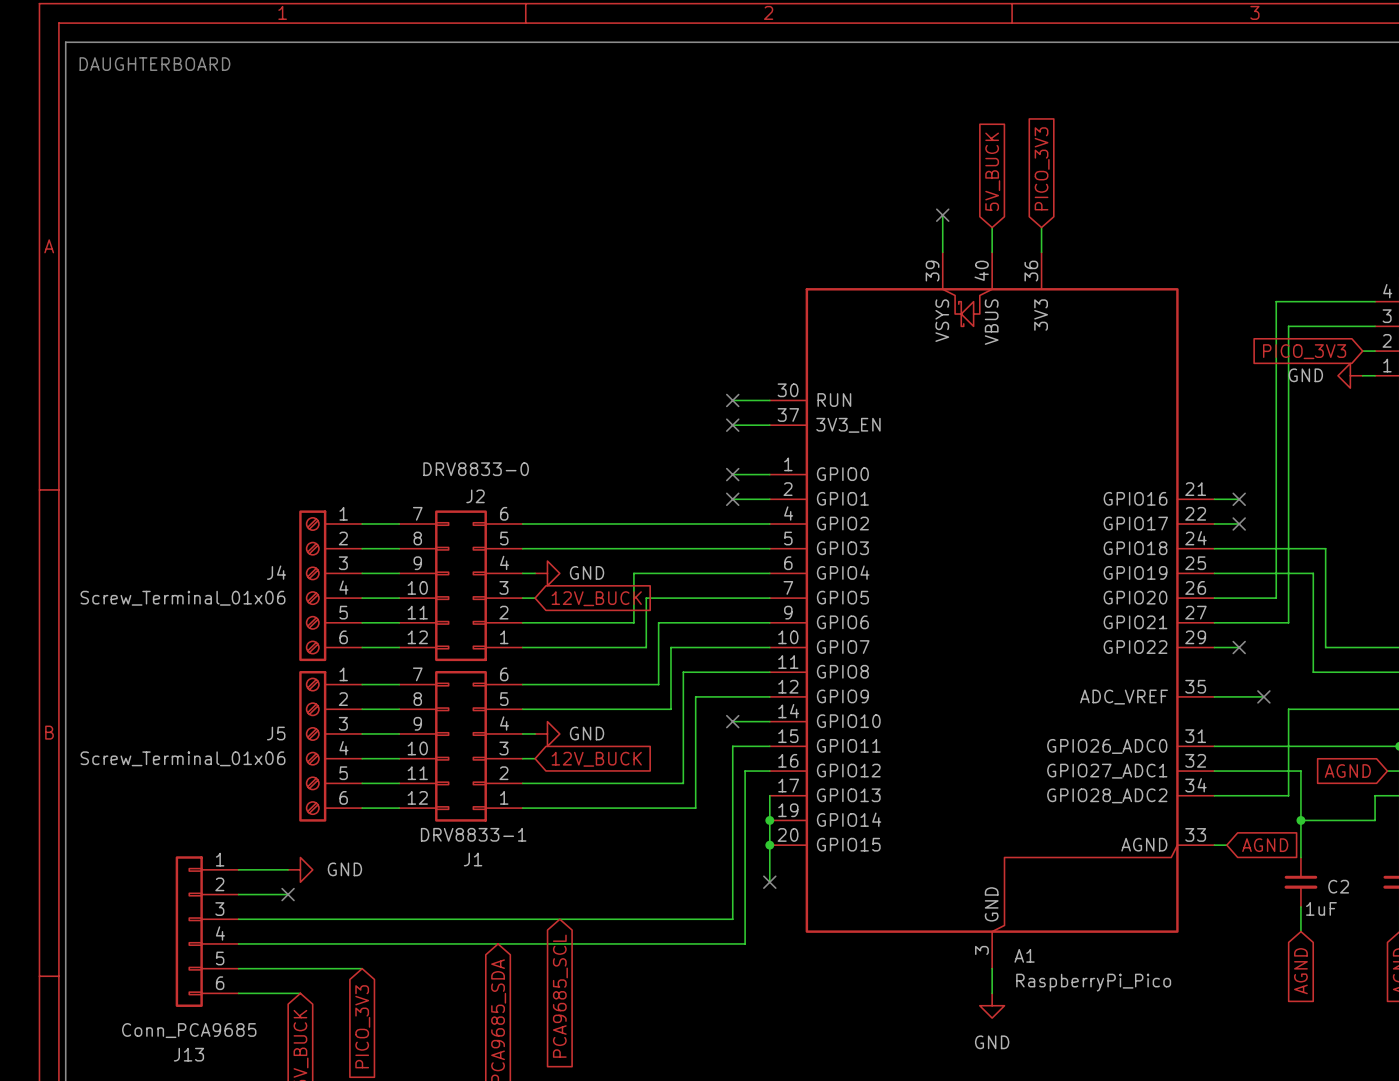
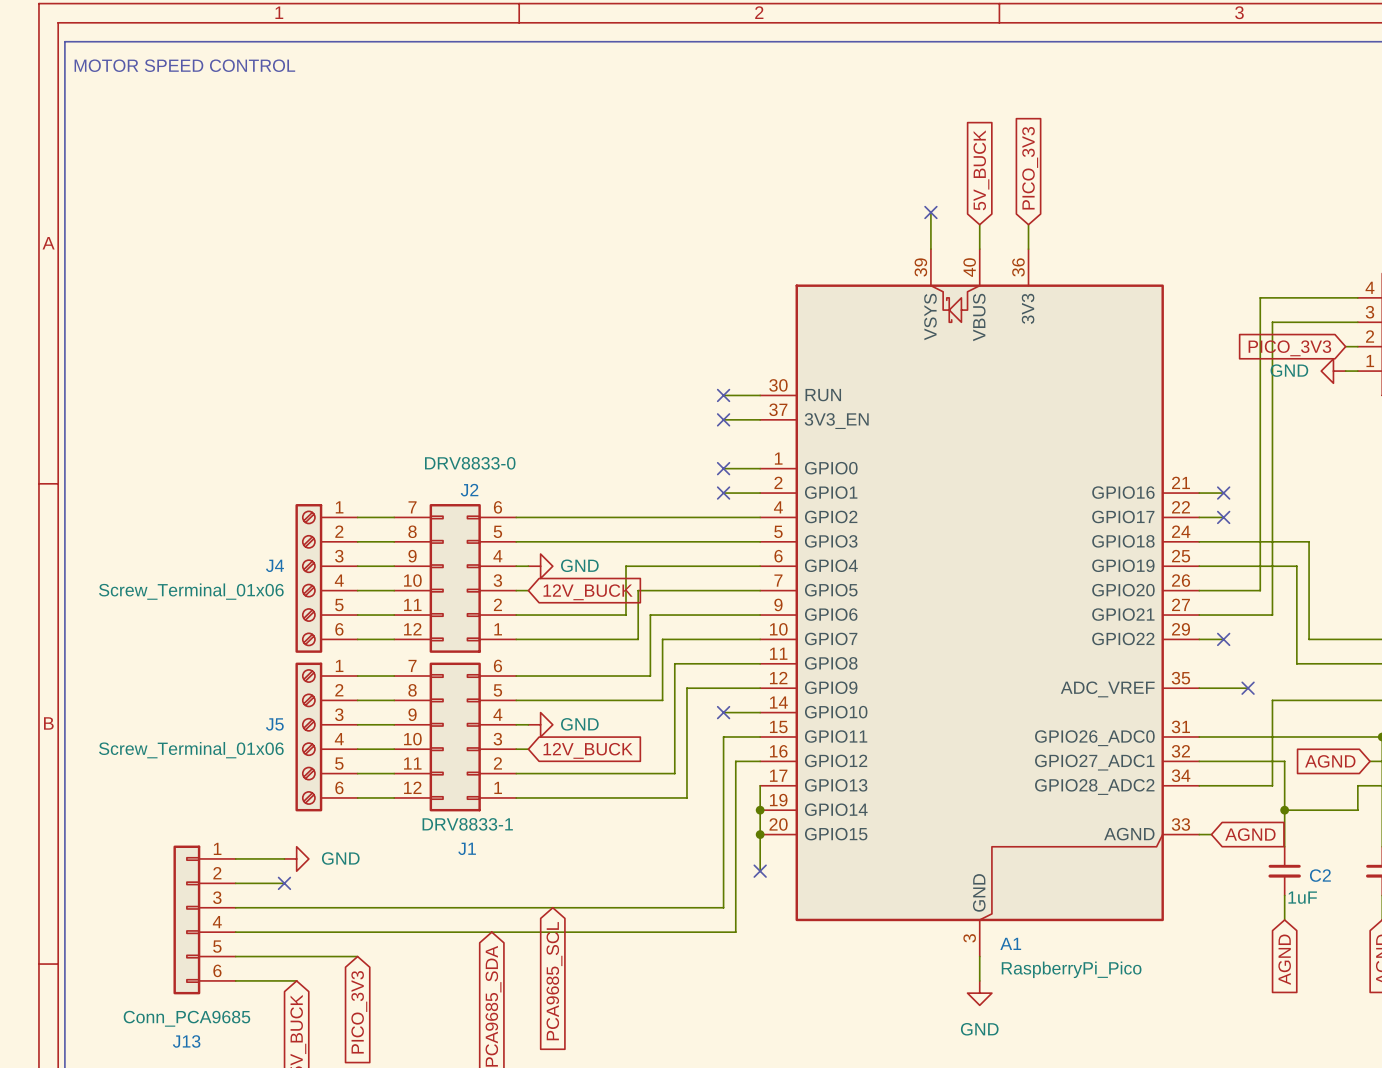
text: DAUGHTERBOARD (154, 64) -> none
text: none -> MOTOR SPEED CONTROL (184, 65)

